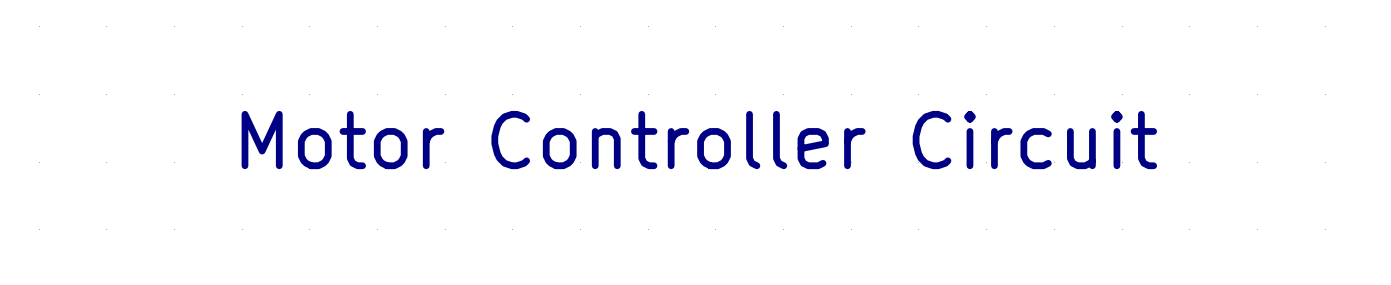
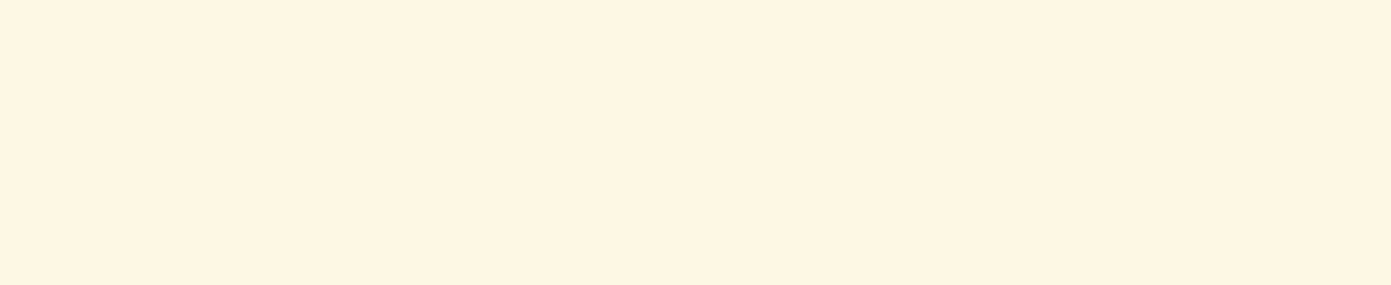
text: Motor Controller Circuit (699, 140) -> none

